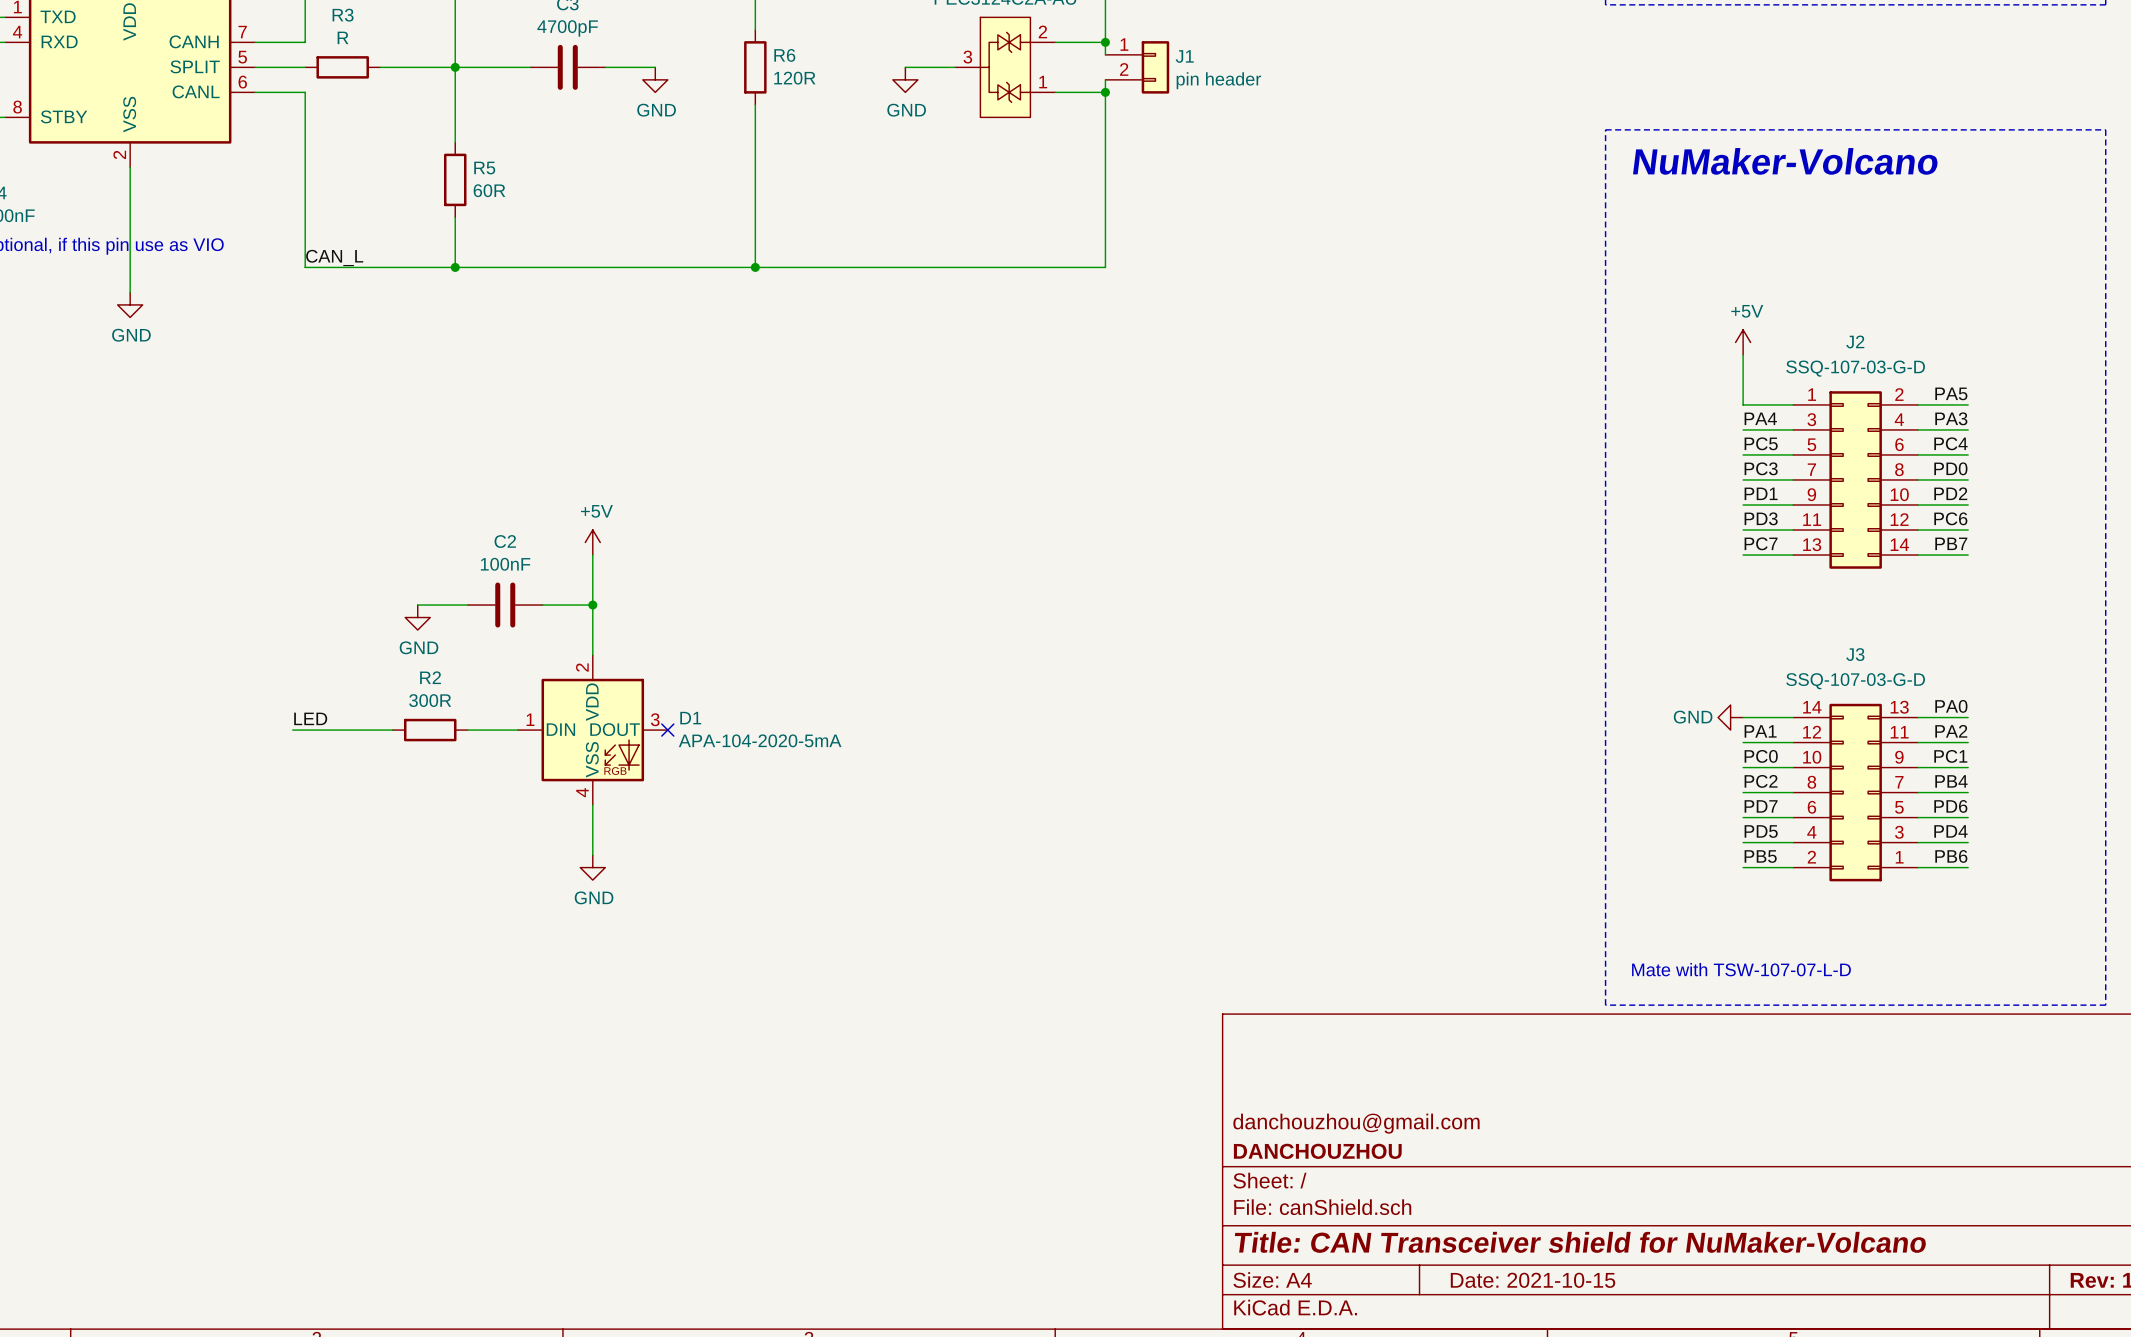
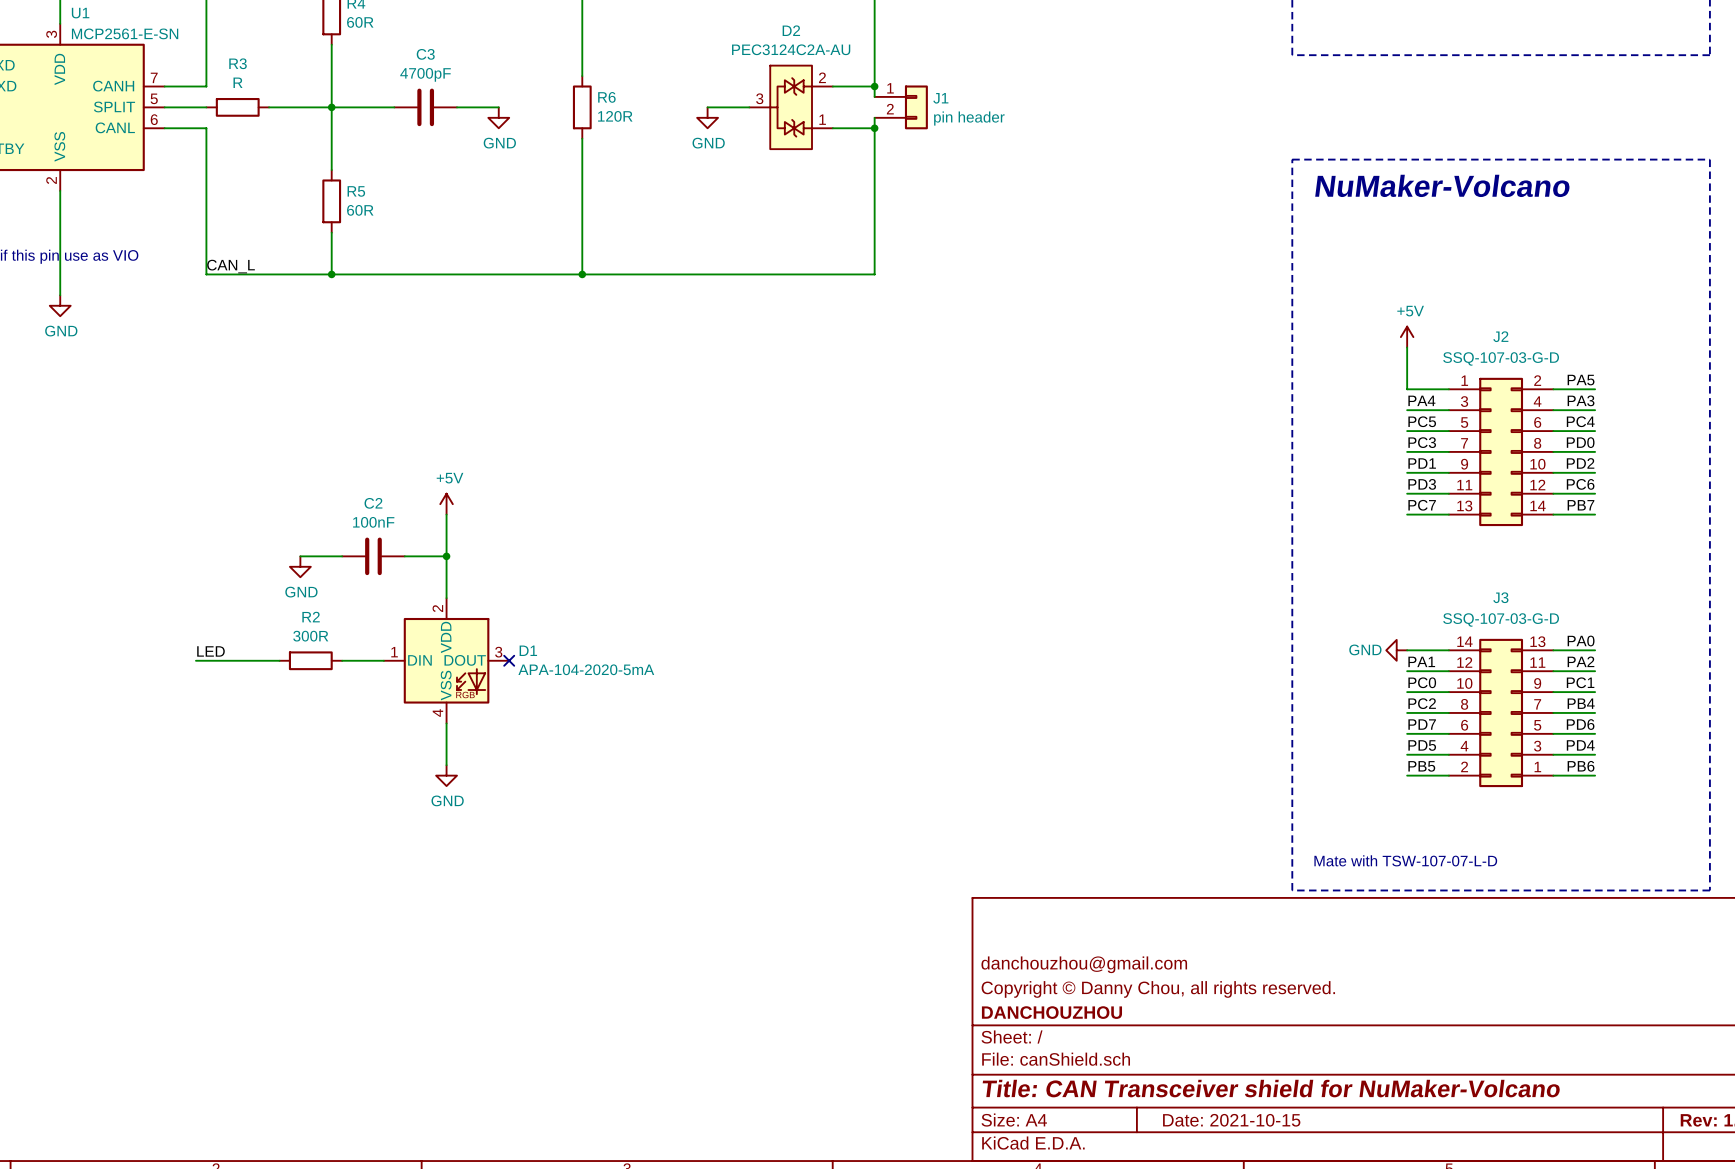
title block: none -> danchouzhou@gmail.com (1084, 964)
title block: danchouzhou@gmail.com (1356, 1123) -> Copyright © Danny Chou, all rights reserved. (1158, 989)

